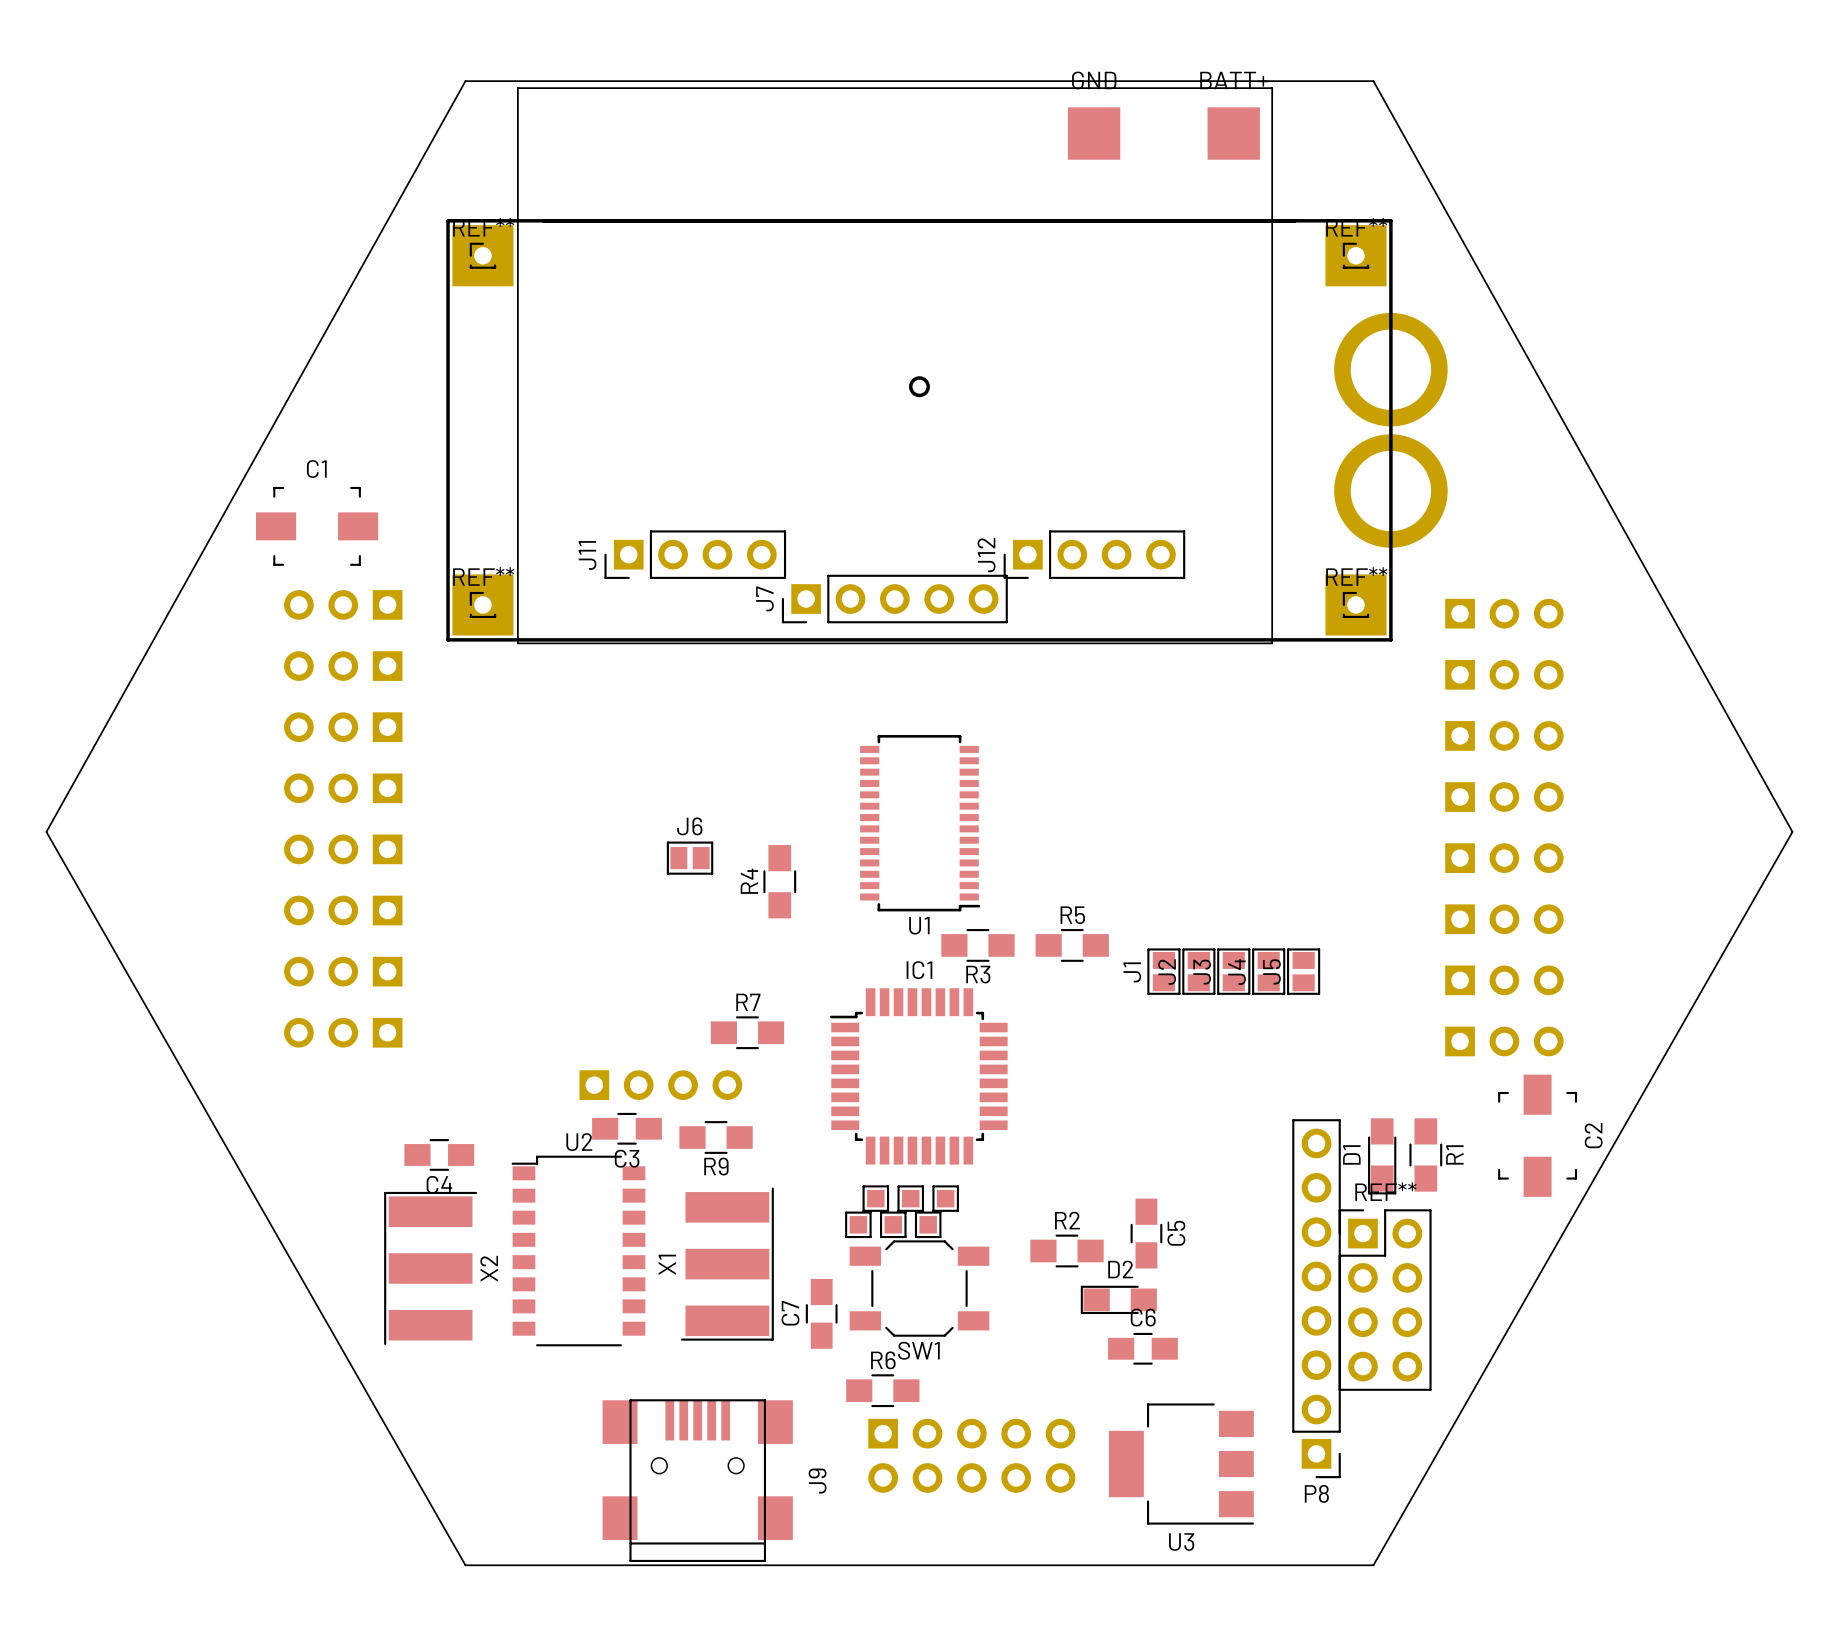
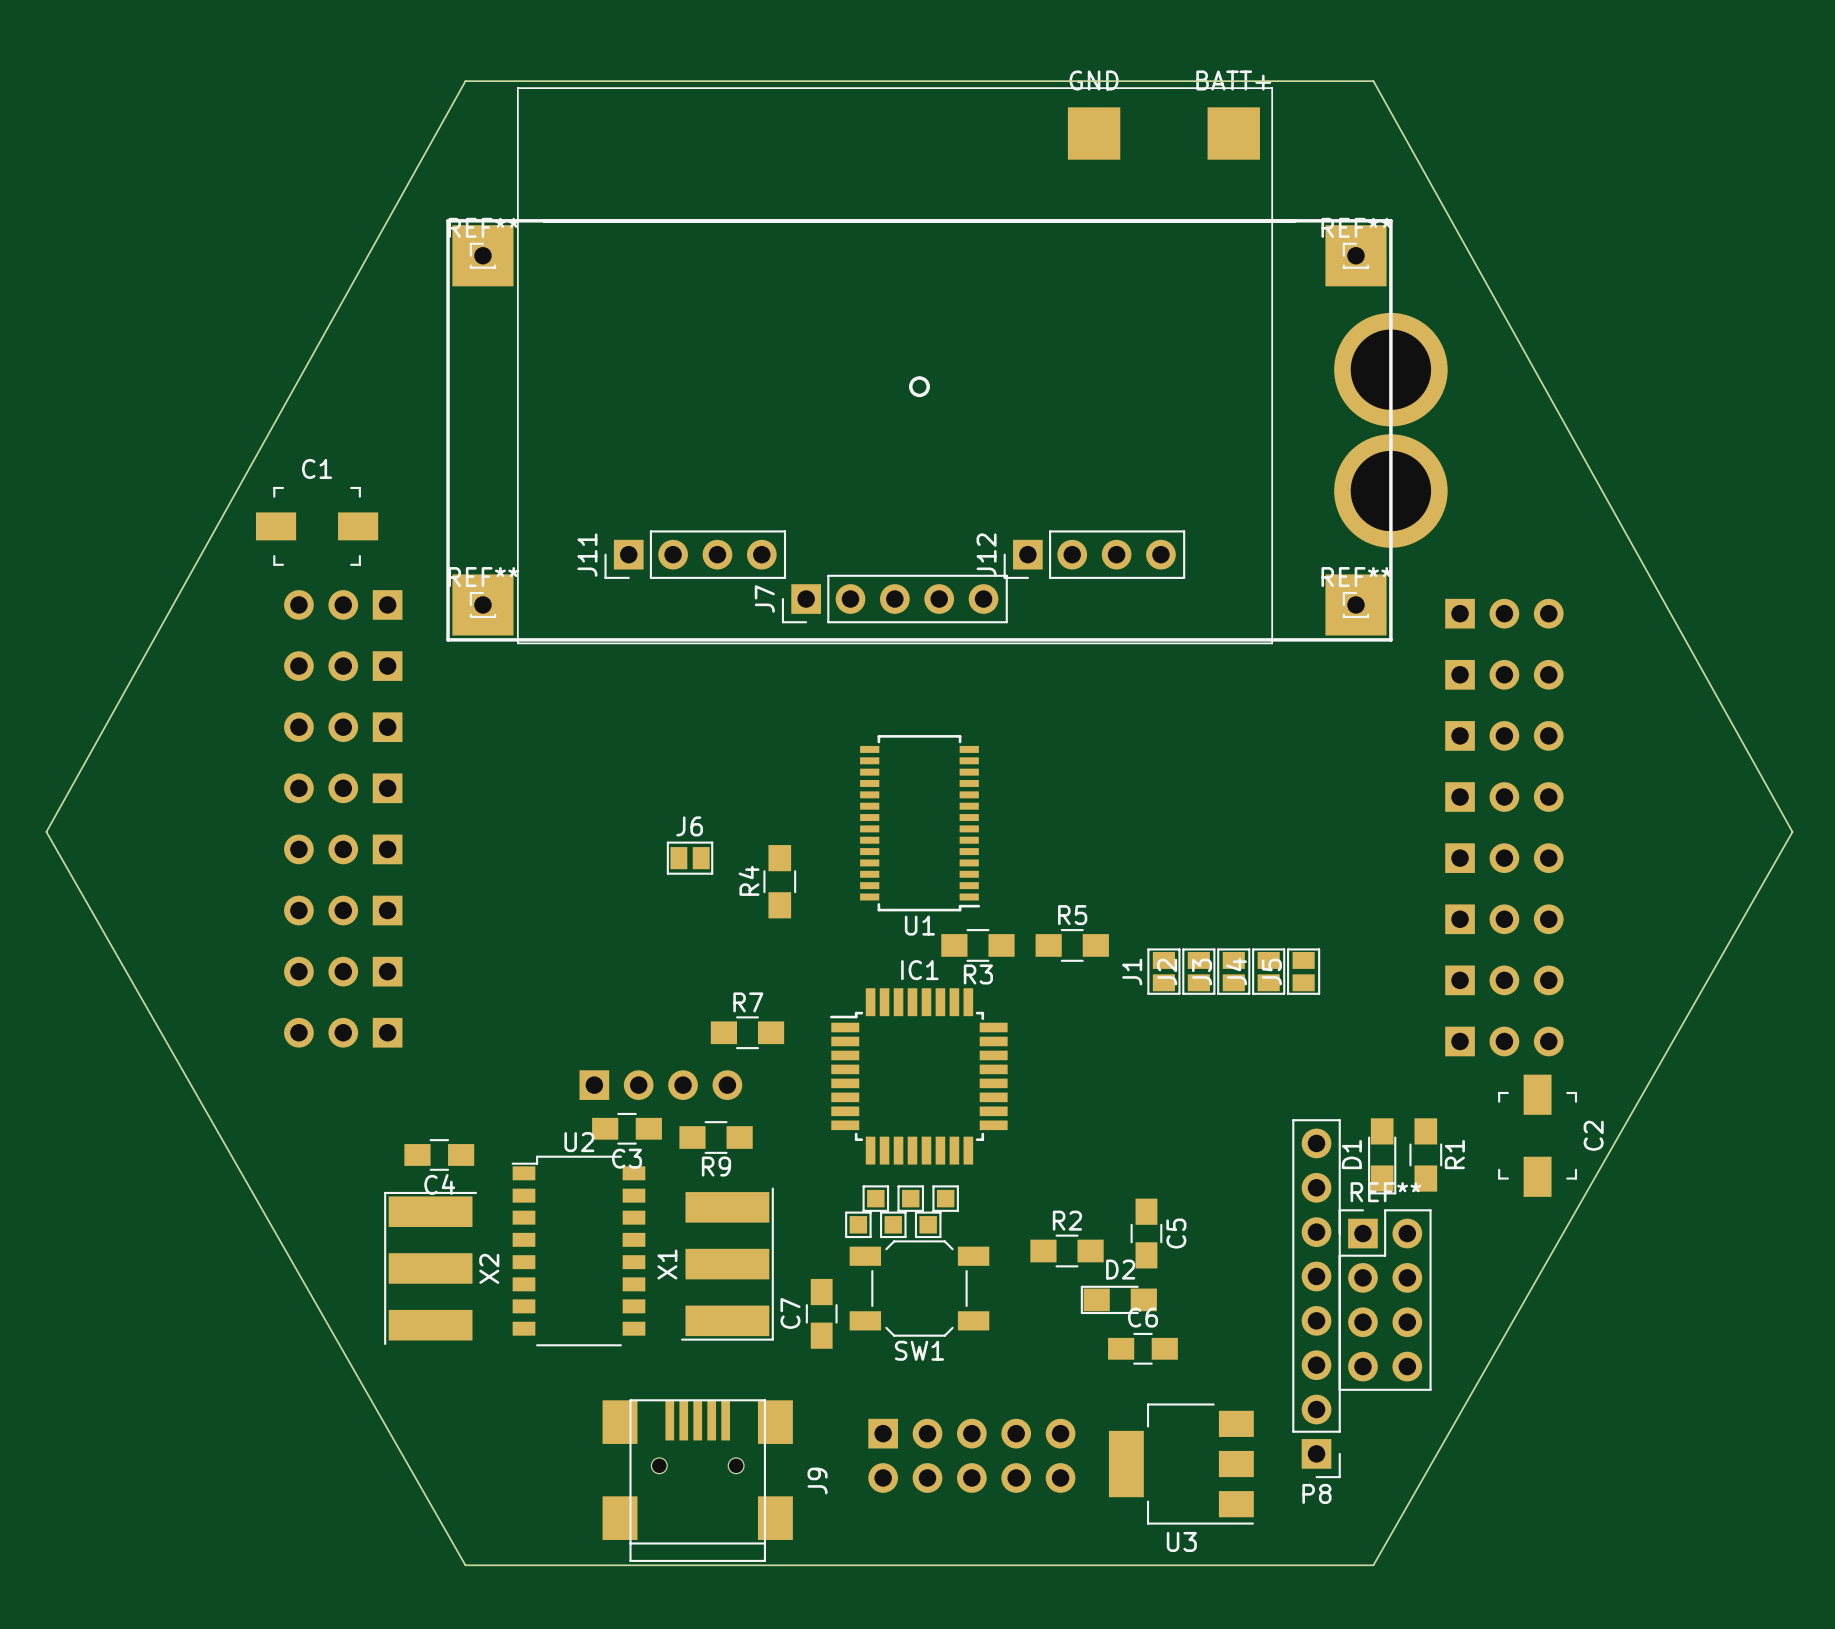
R6: (882, 1390) -> none

